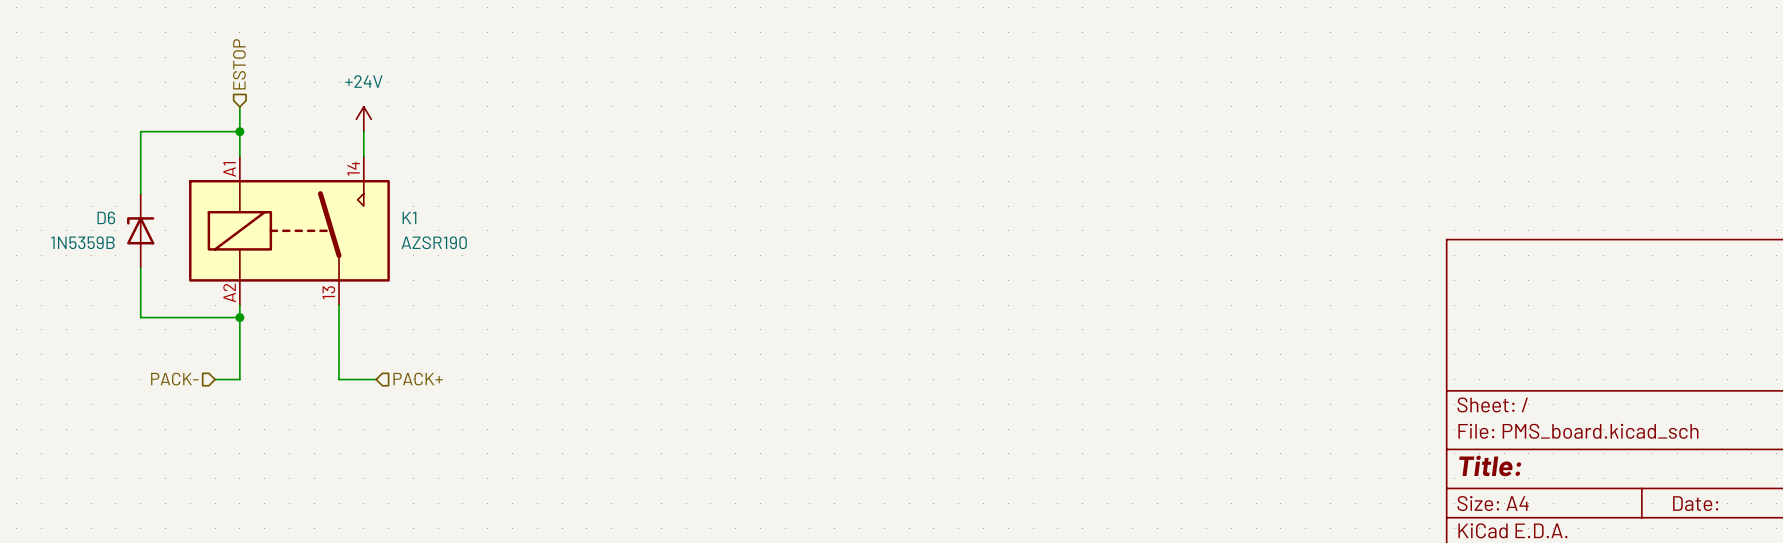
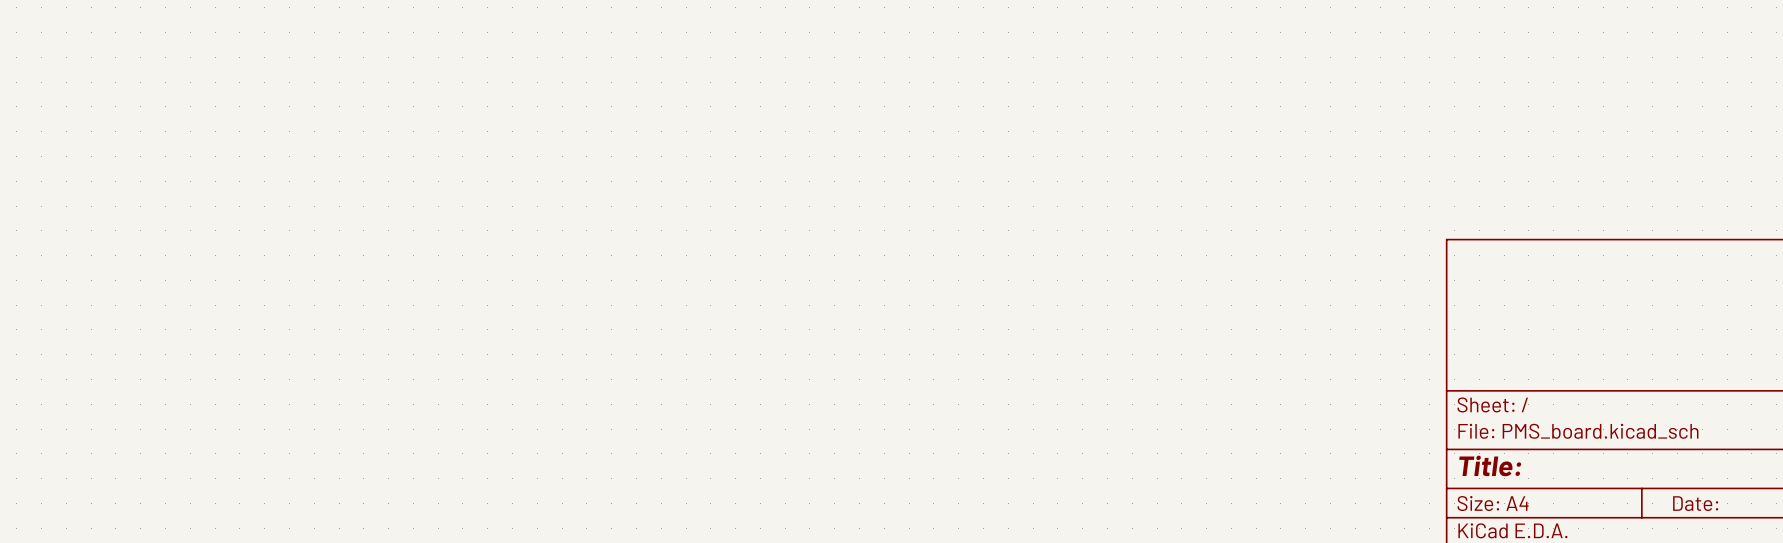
hierarchical label: ESTOP (239, 64) -> none
wire: (239, 106) (239, 156) -> none
power symbol: +24V (363, 119) -> none
wire: (239, 131) (140, 131) (140, 193) -> none
junction: (239, 131) -> none
wire: (363, 131) (363, 156) -> none
D6: 1N5359B (140, 230) -> none
K1: AZSR190 (289, 230) -> none
wire: (140, 268) (140, 317) (239, 317) -> none
wire: (239, 305) (239, 379) (215, 379) -> none
wire: (339, 305) (339, 379) (376, 379) -> none
junction: (239, 317) -> none
hierarchical label: PACK- (174, 379) -> none
hierarchical label: PACK+ (418, 379) -> none

